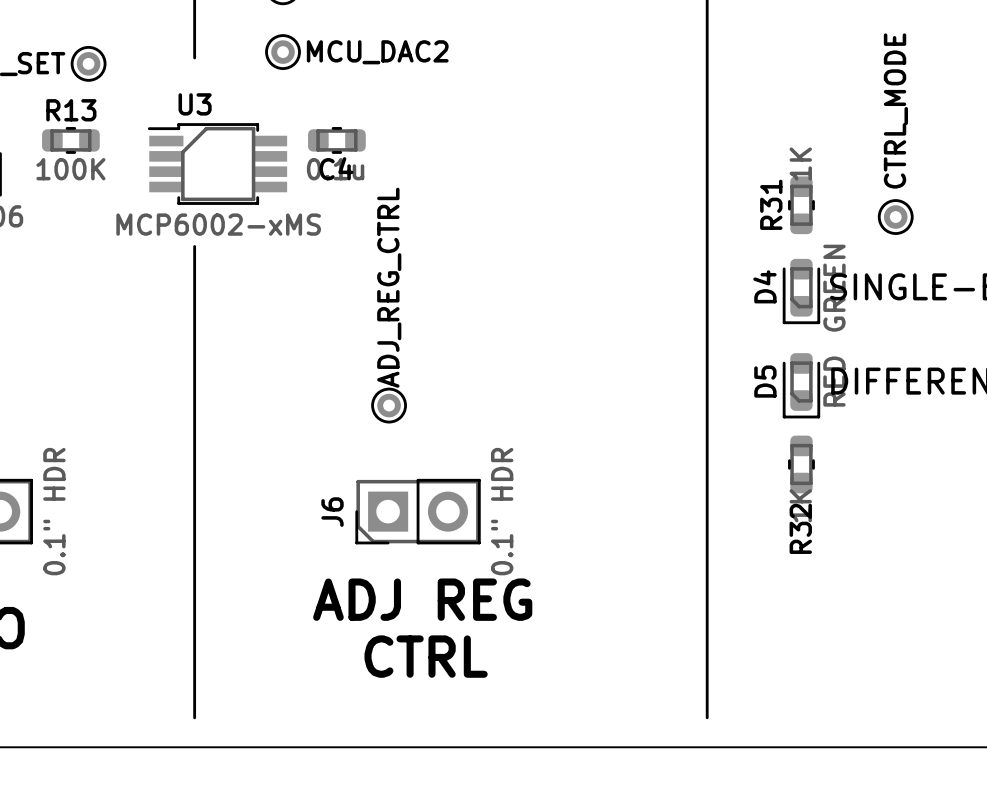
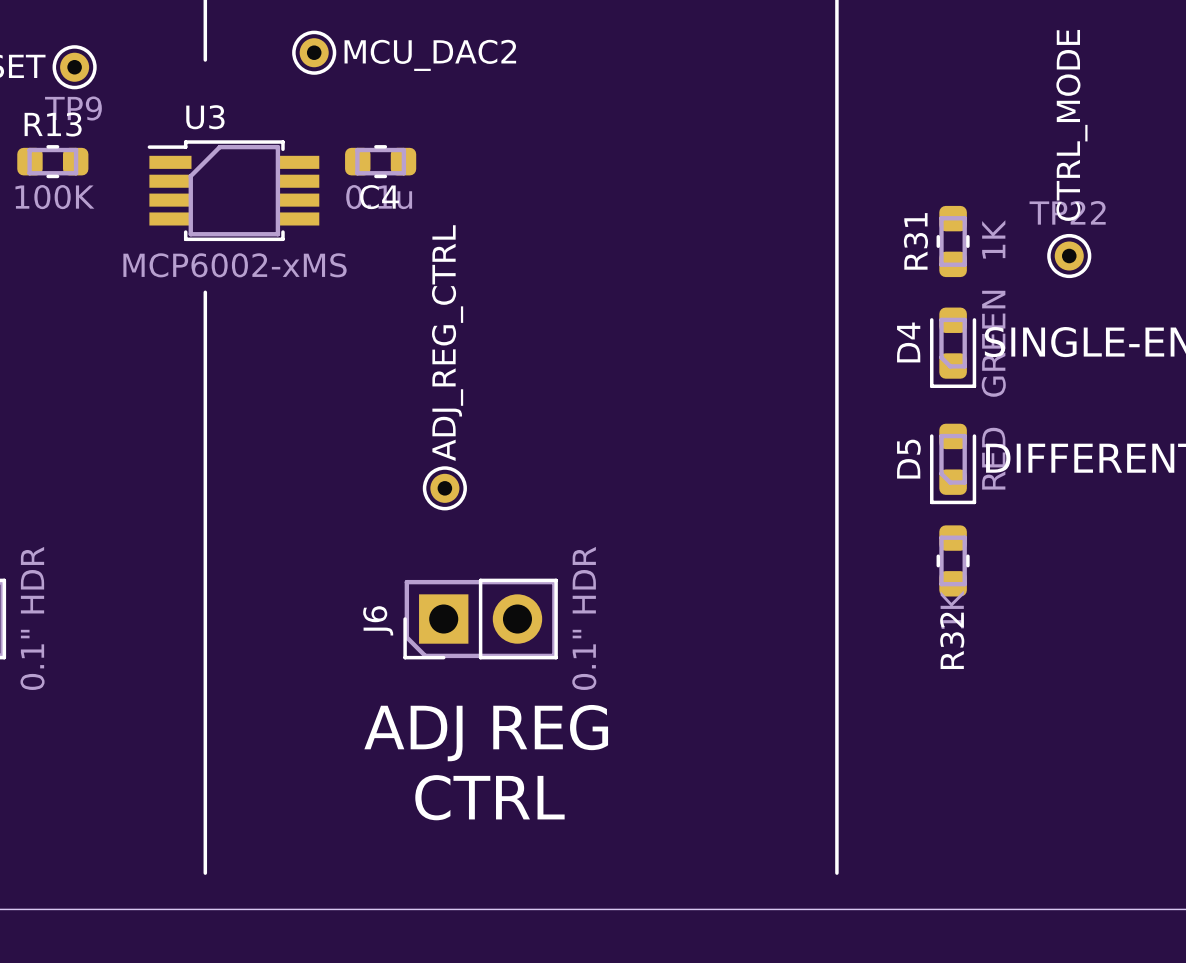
TP9 name: none -> TP9 (73, 108)
R31 value position: 1K (800, 164) -> 1K (993, 239)
TP22 name: none -> TP22 (1067, 212)

